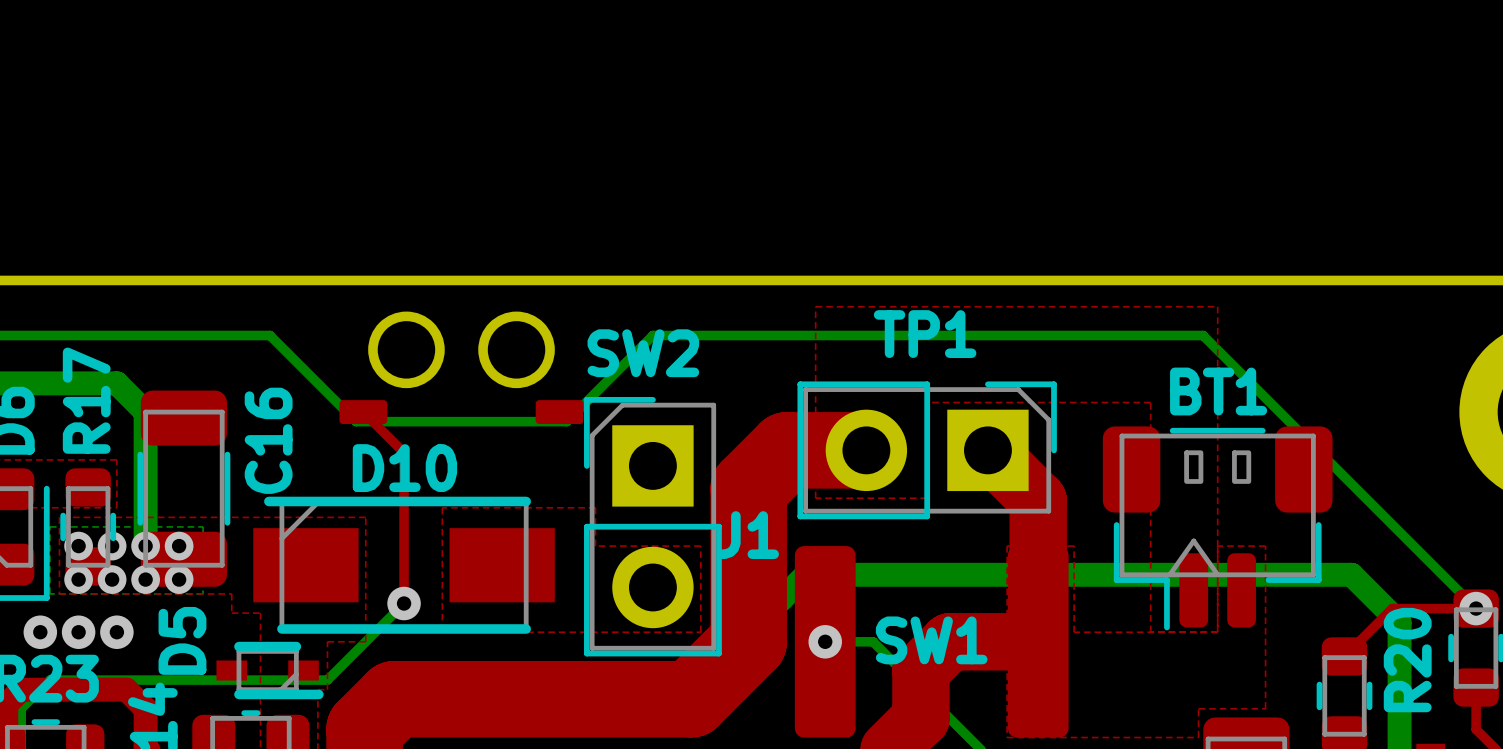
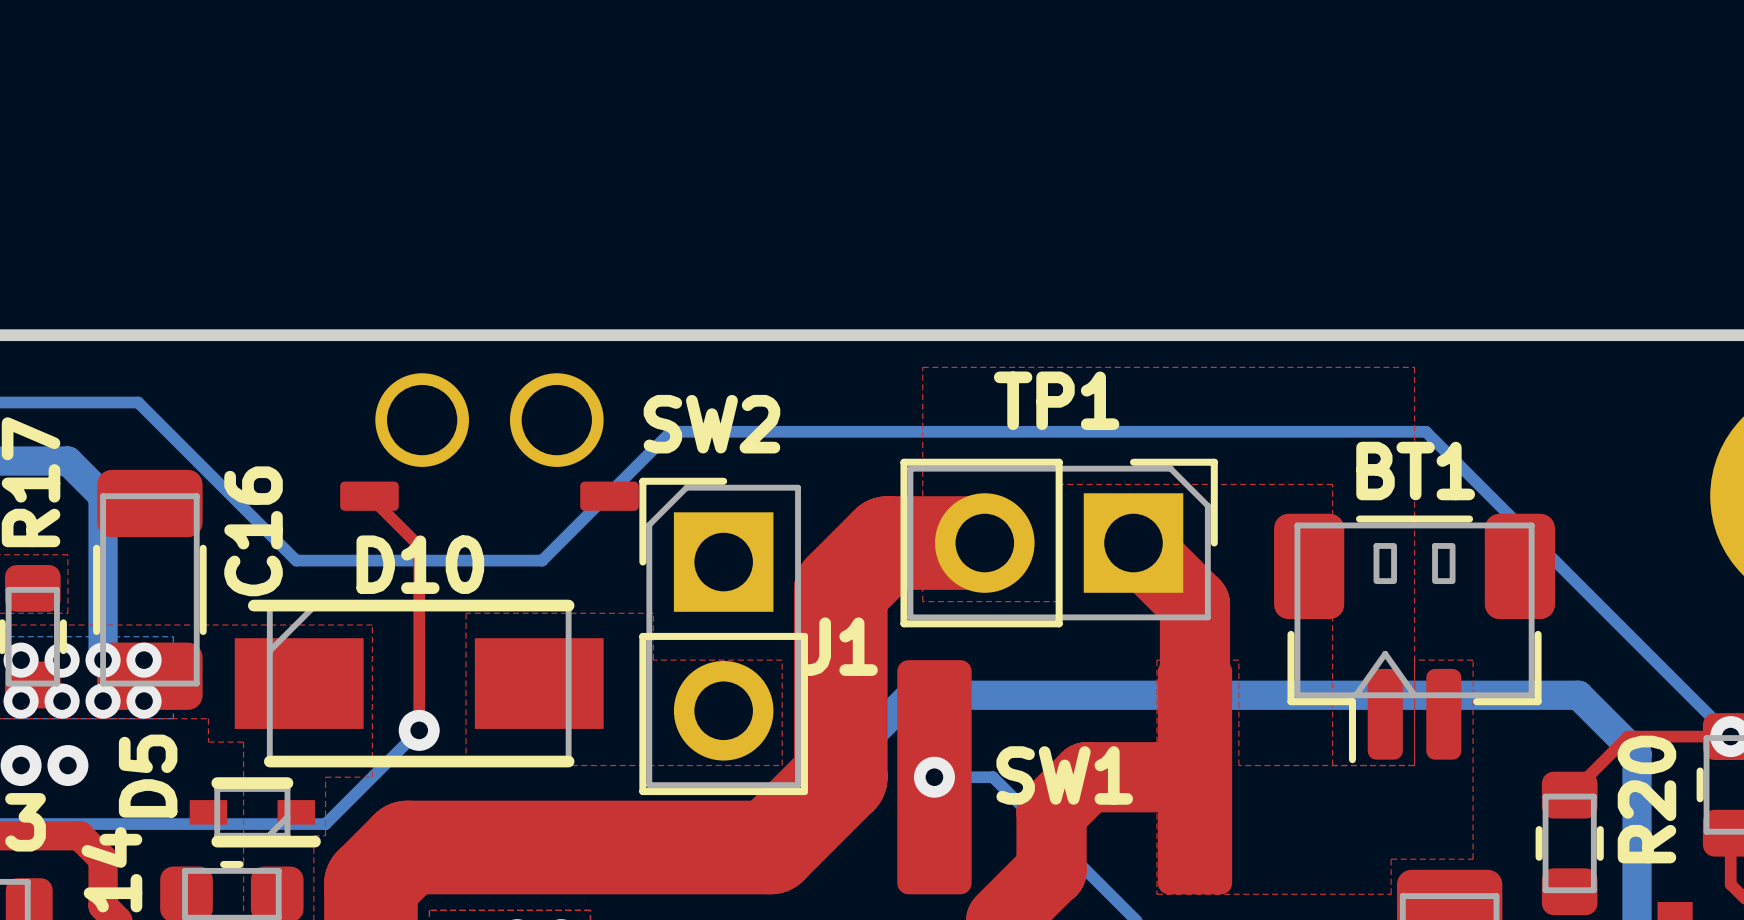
bottom track: (174, 335) (270, 335) (356, 421) (566, 421) (652, 335) (1203, 335) (1226, 359) -> (138, 402) (296, 560) (542, 560) (670, 431) (1425, 431)

